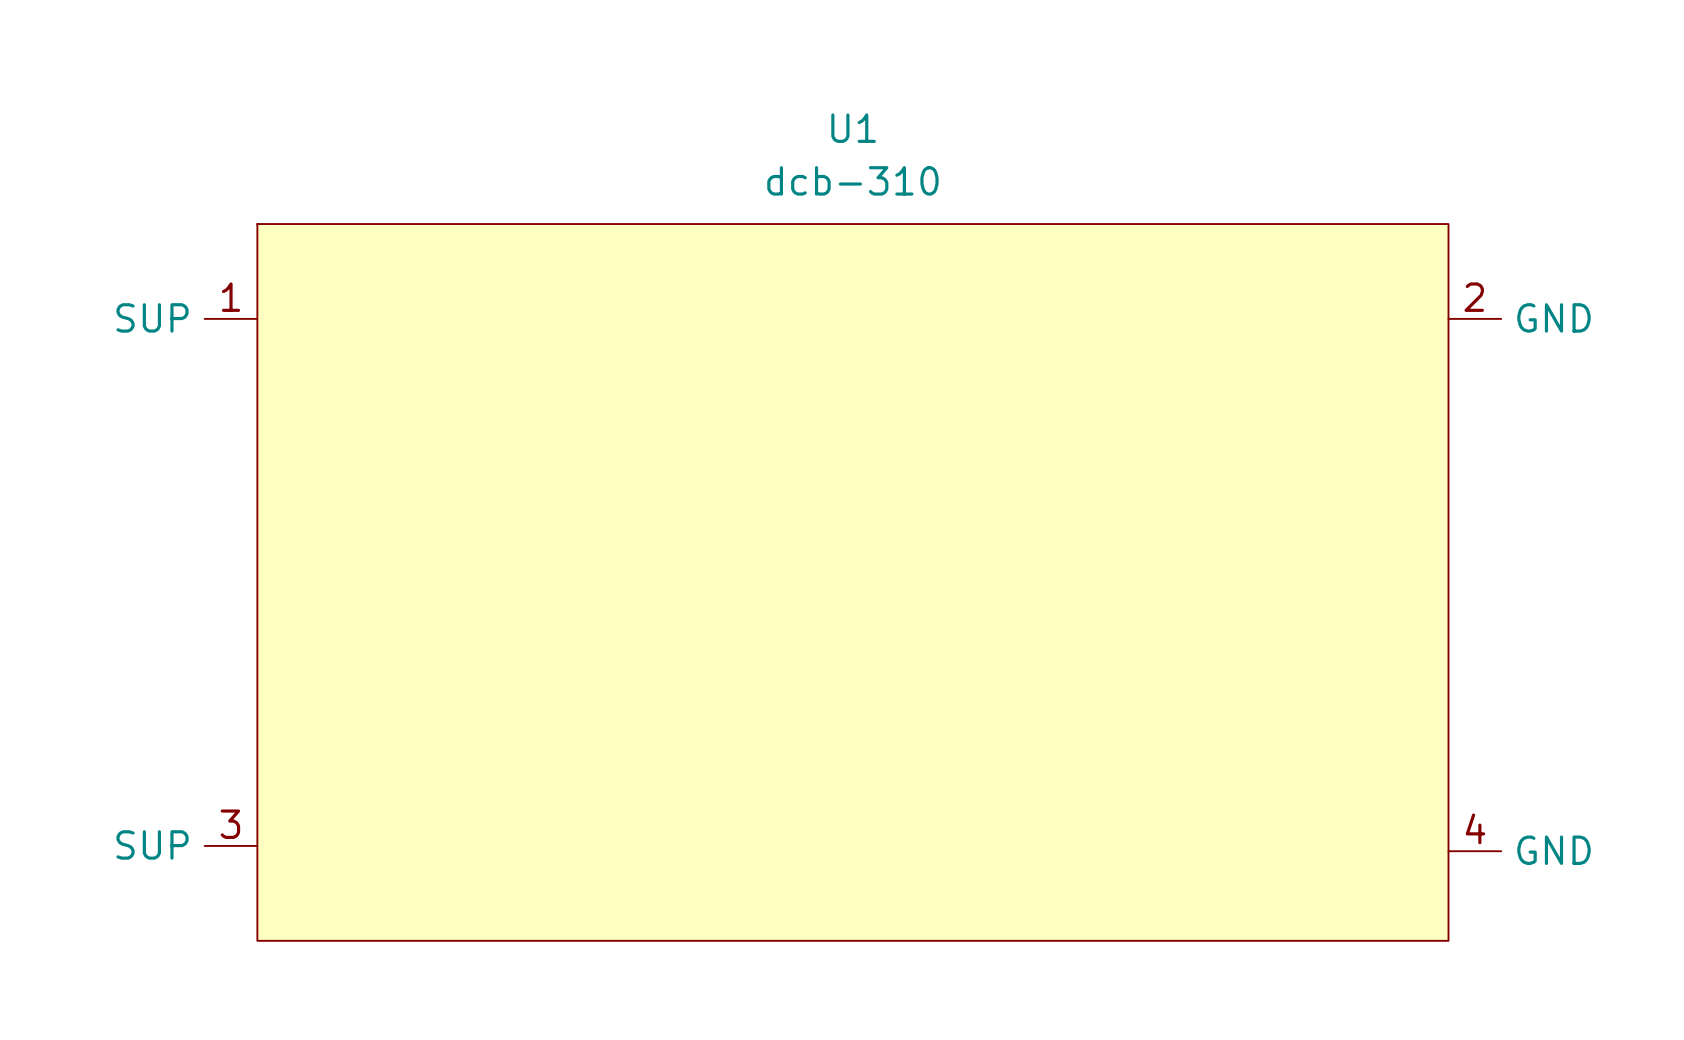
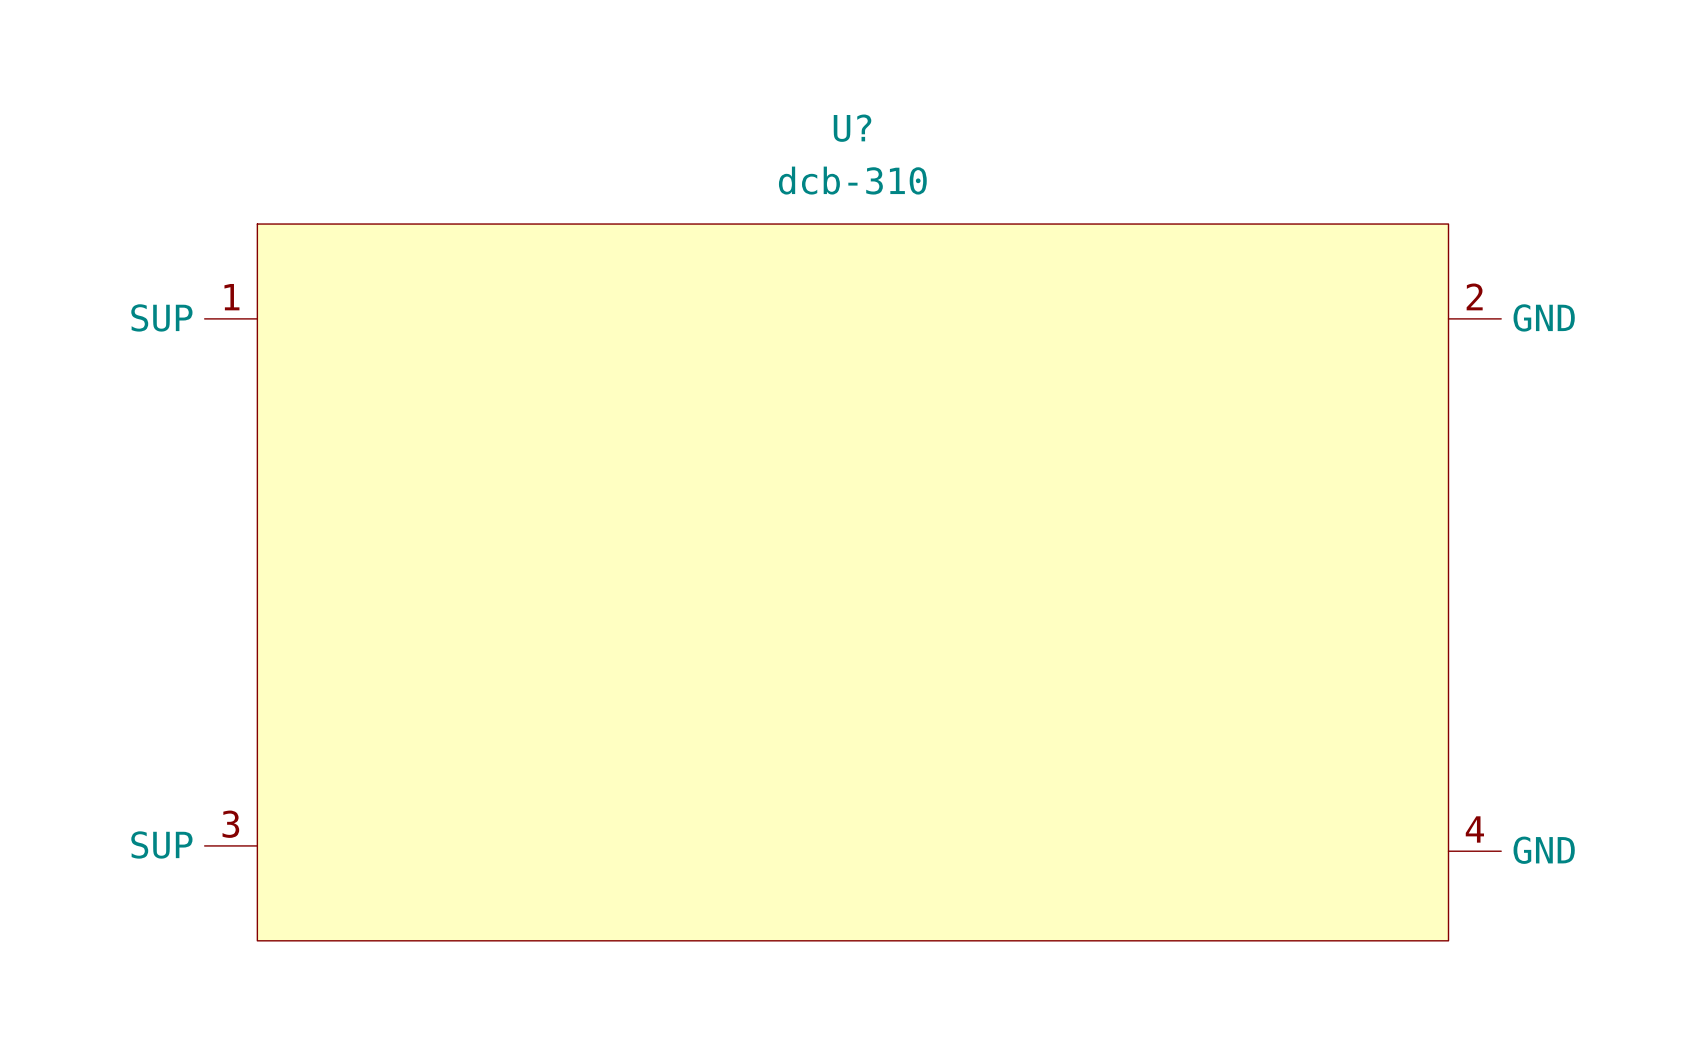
U1 name: U1 (853, 128) -> U? (852, 128)

